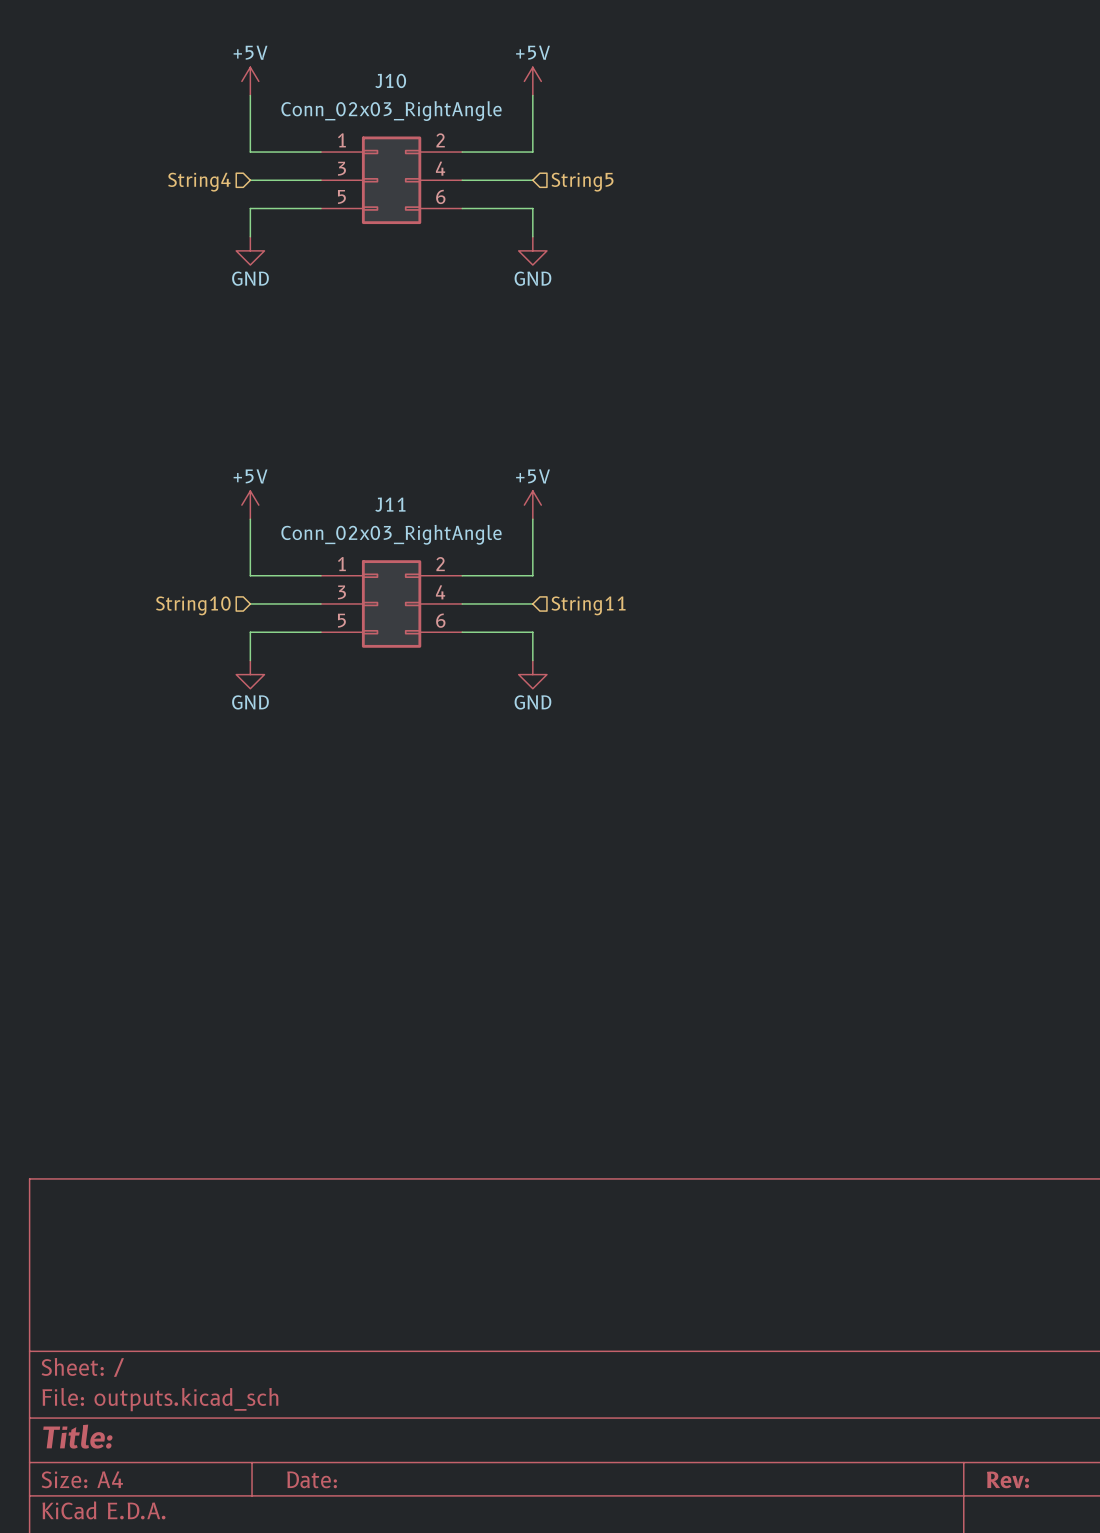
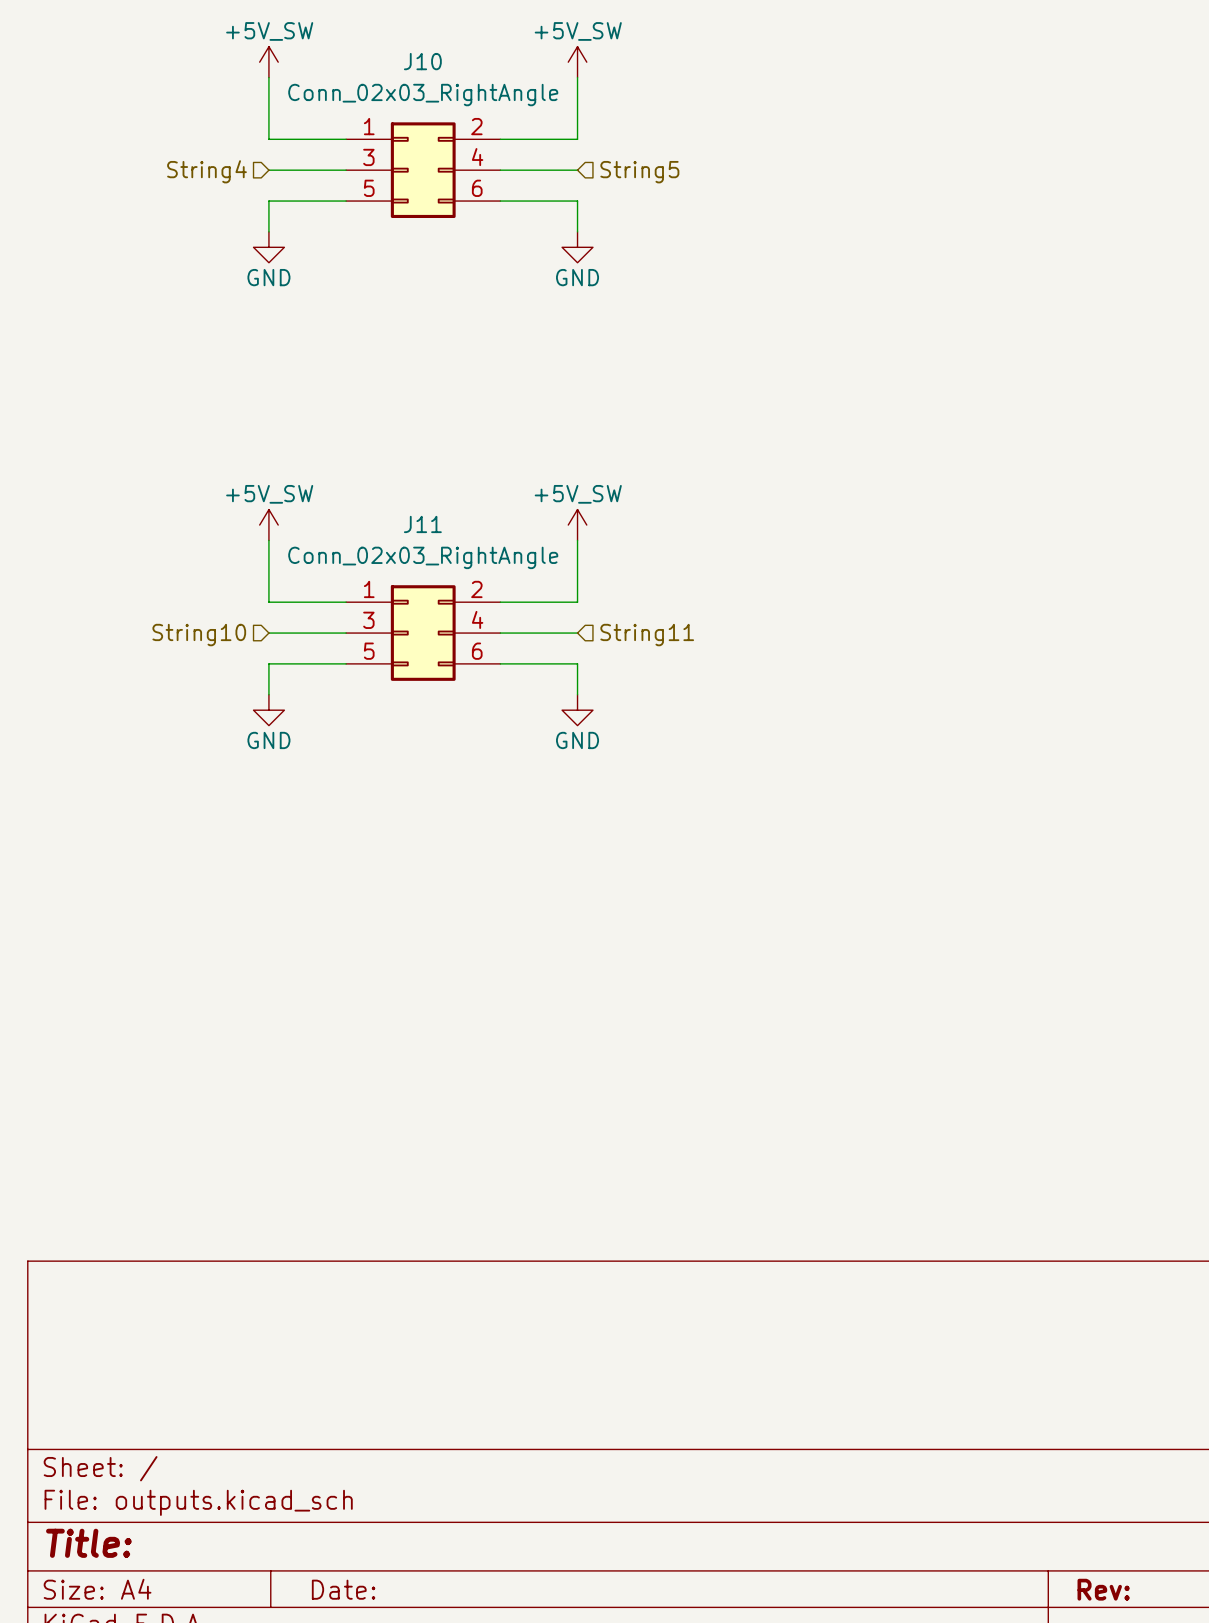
power symbol: +5V (250, 81) -> +5V_SW (268, 62)
power symbol: +5V (532, 81) -> +5V_SW (577, 62)
power symbol: +5V (250, 505) -> +5V_SW (268, 525)
power symbol: +5V (532, 505) -> +5V_SW (577, 525)

